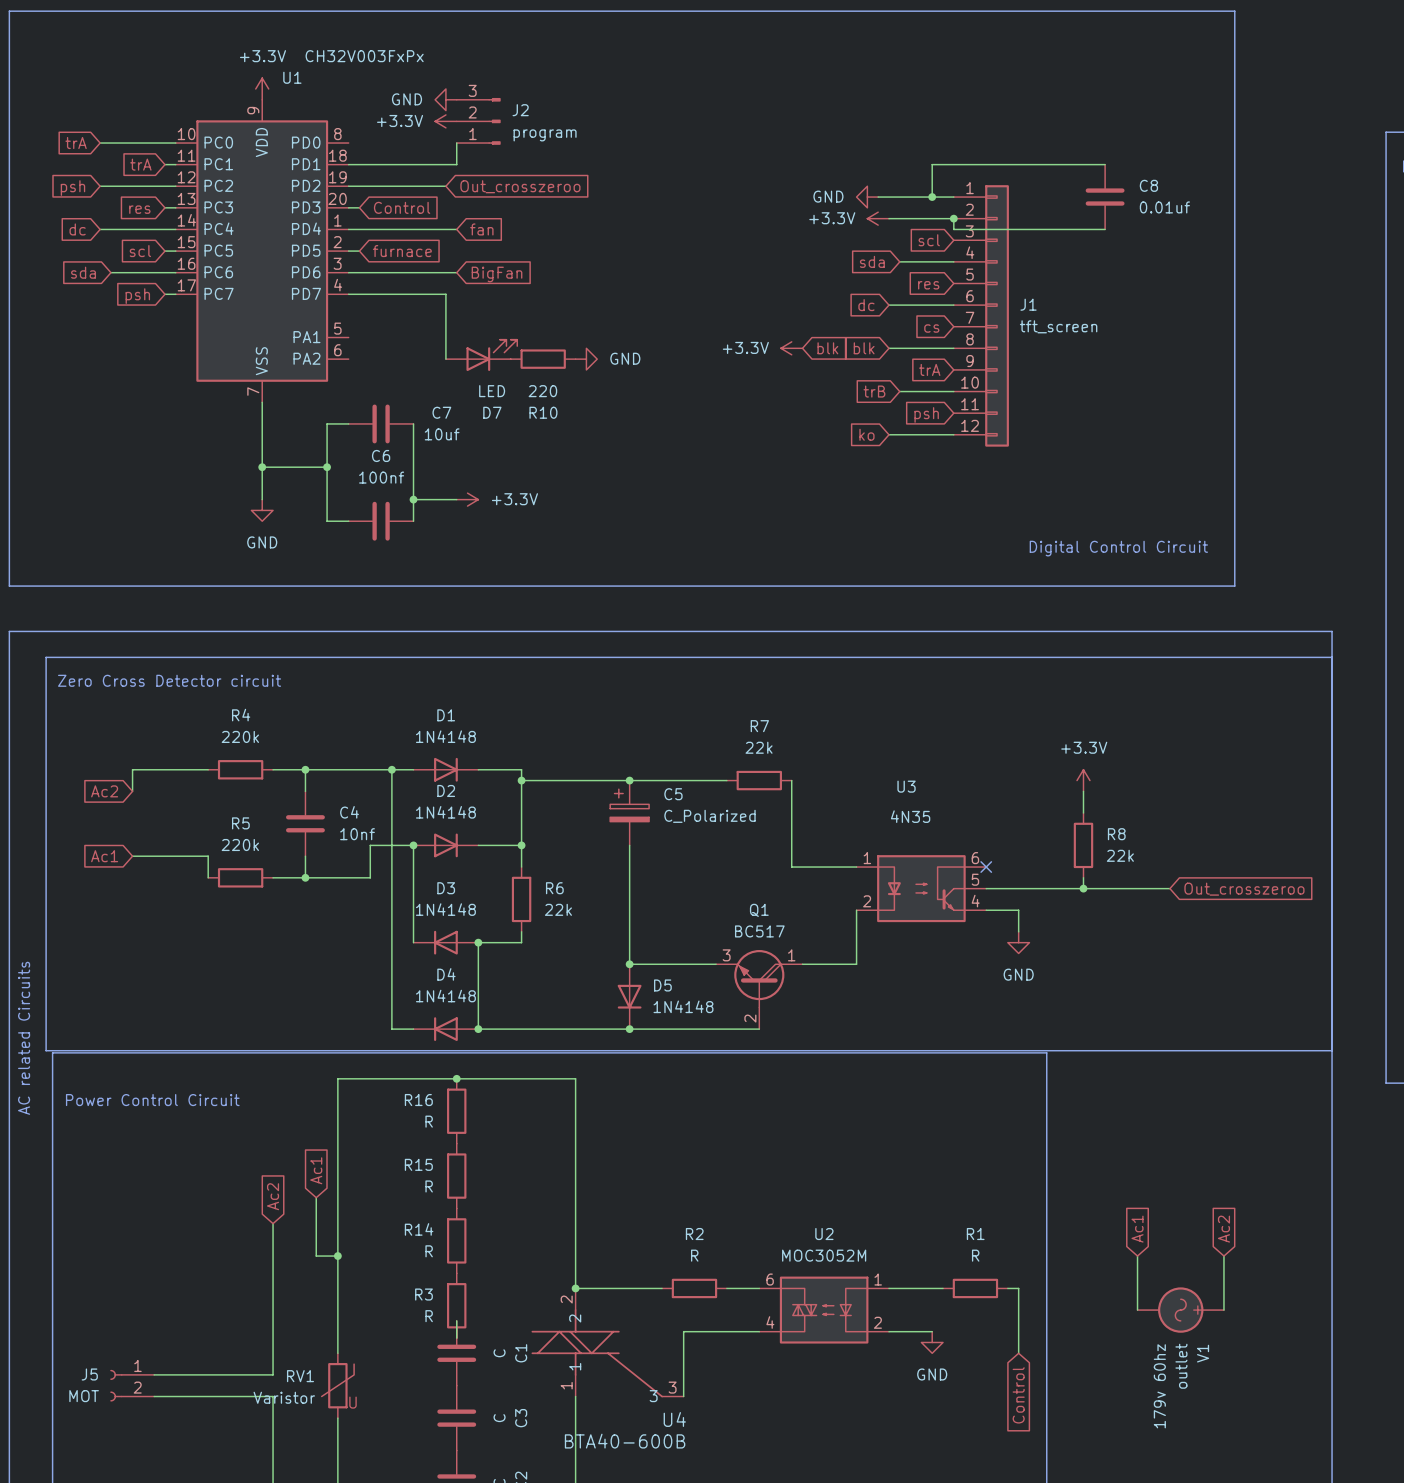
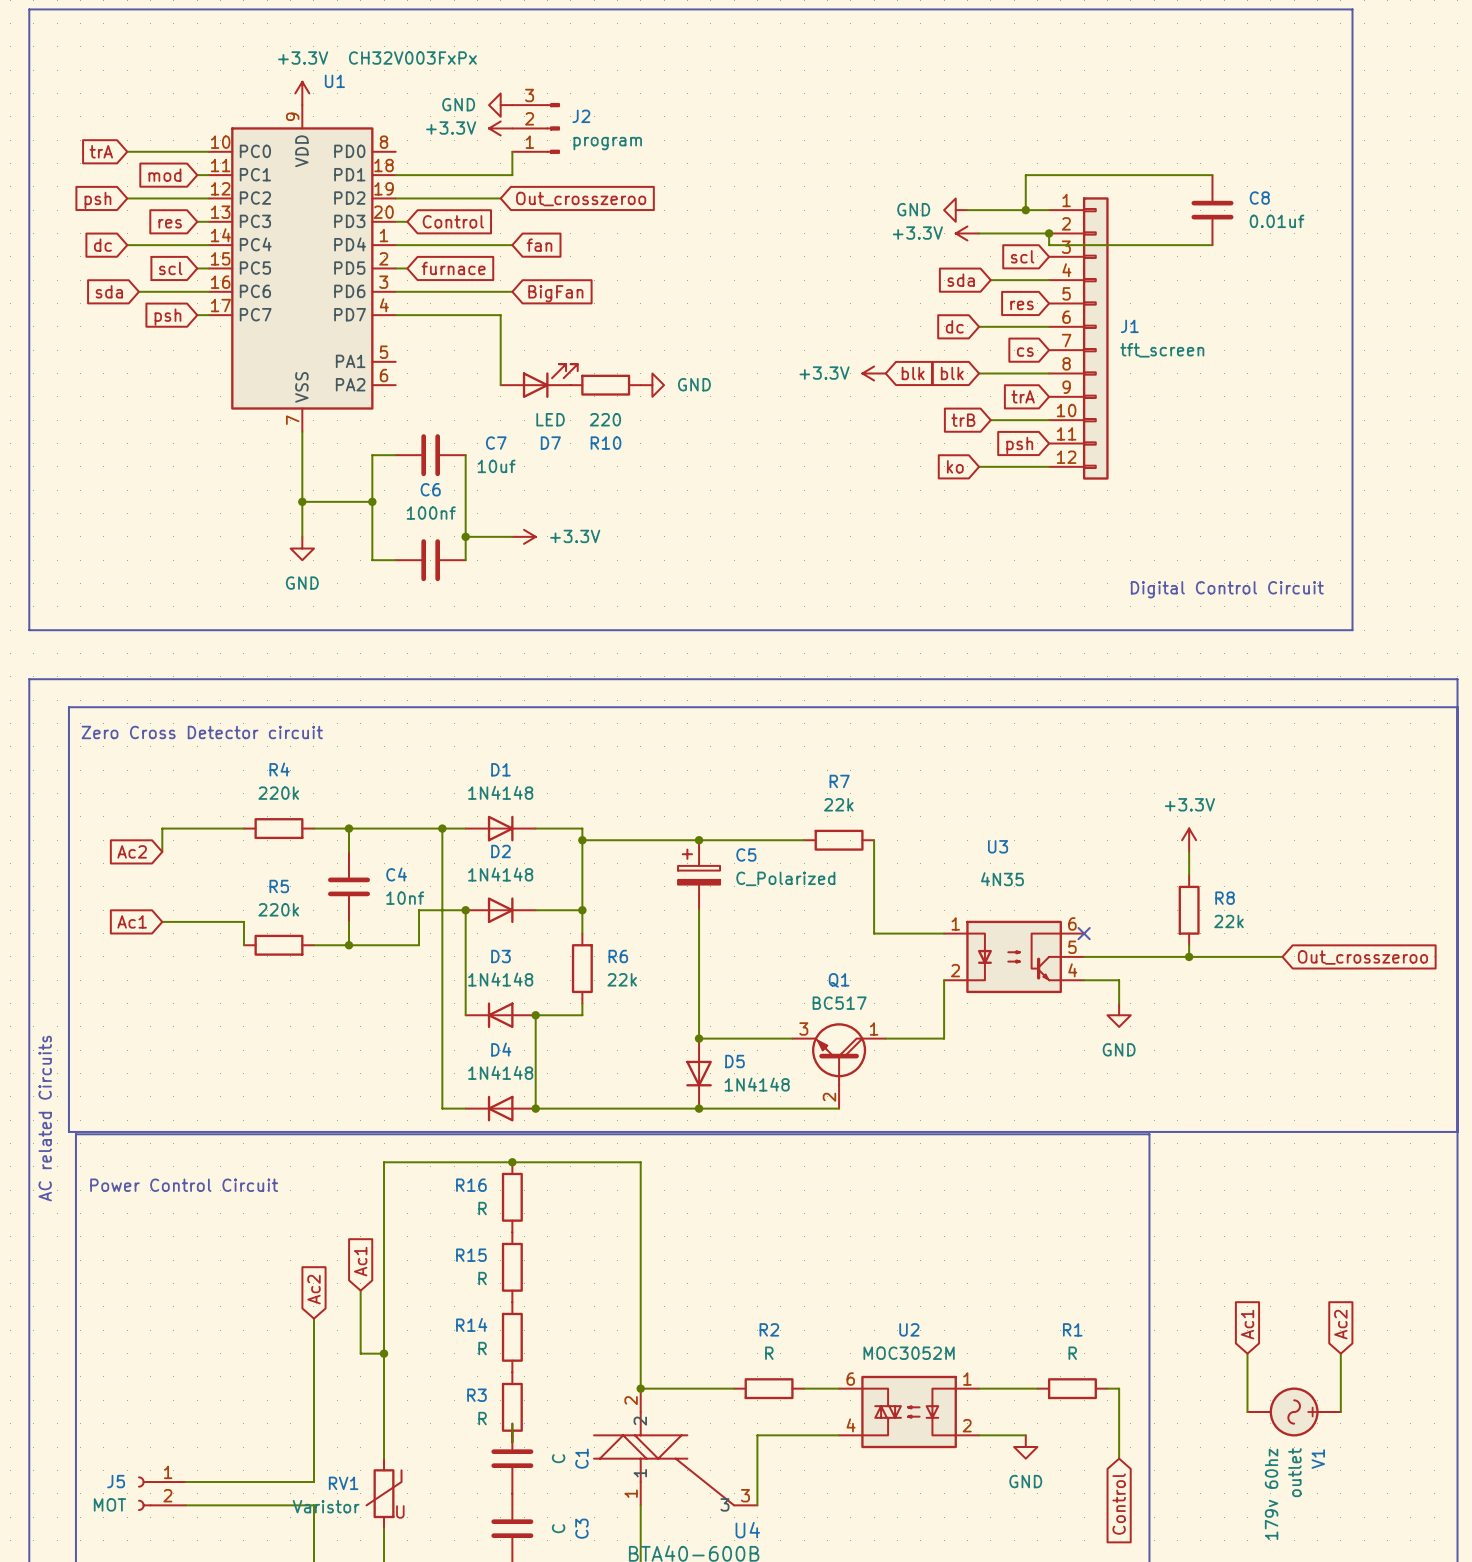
global label: trA (140, 164) -> mod (164, 175)

